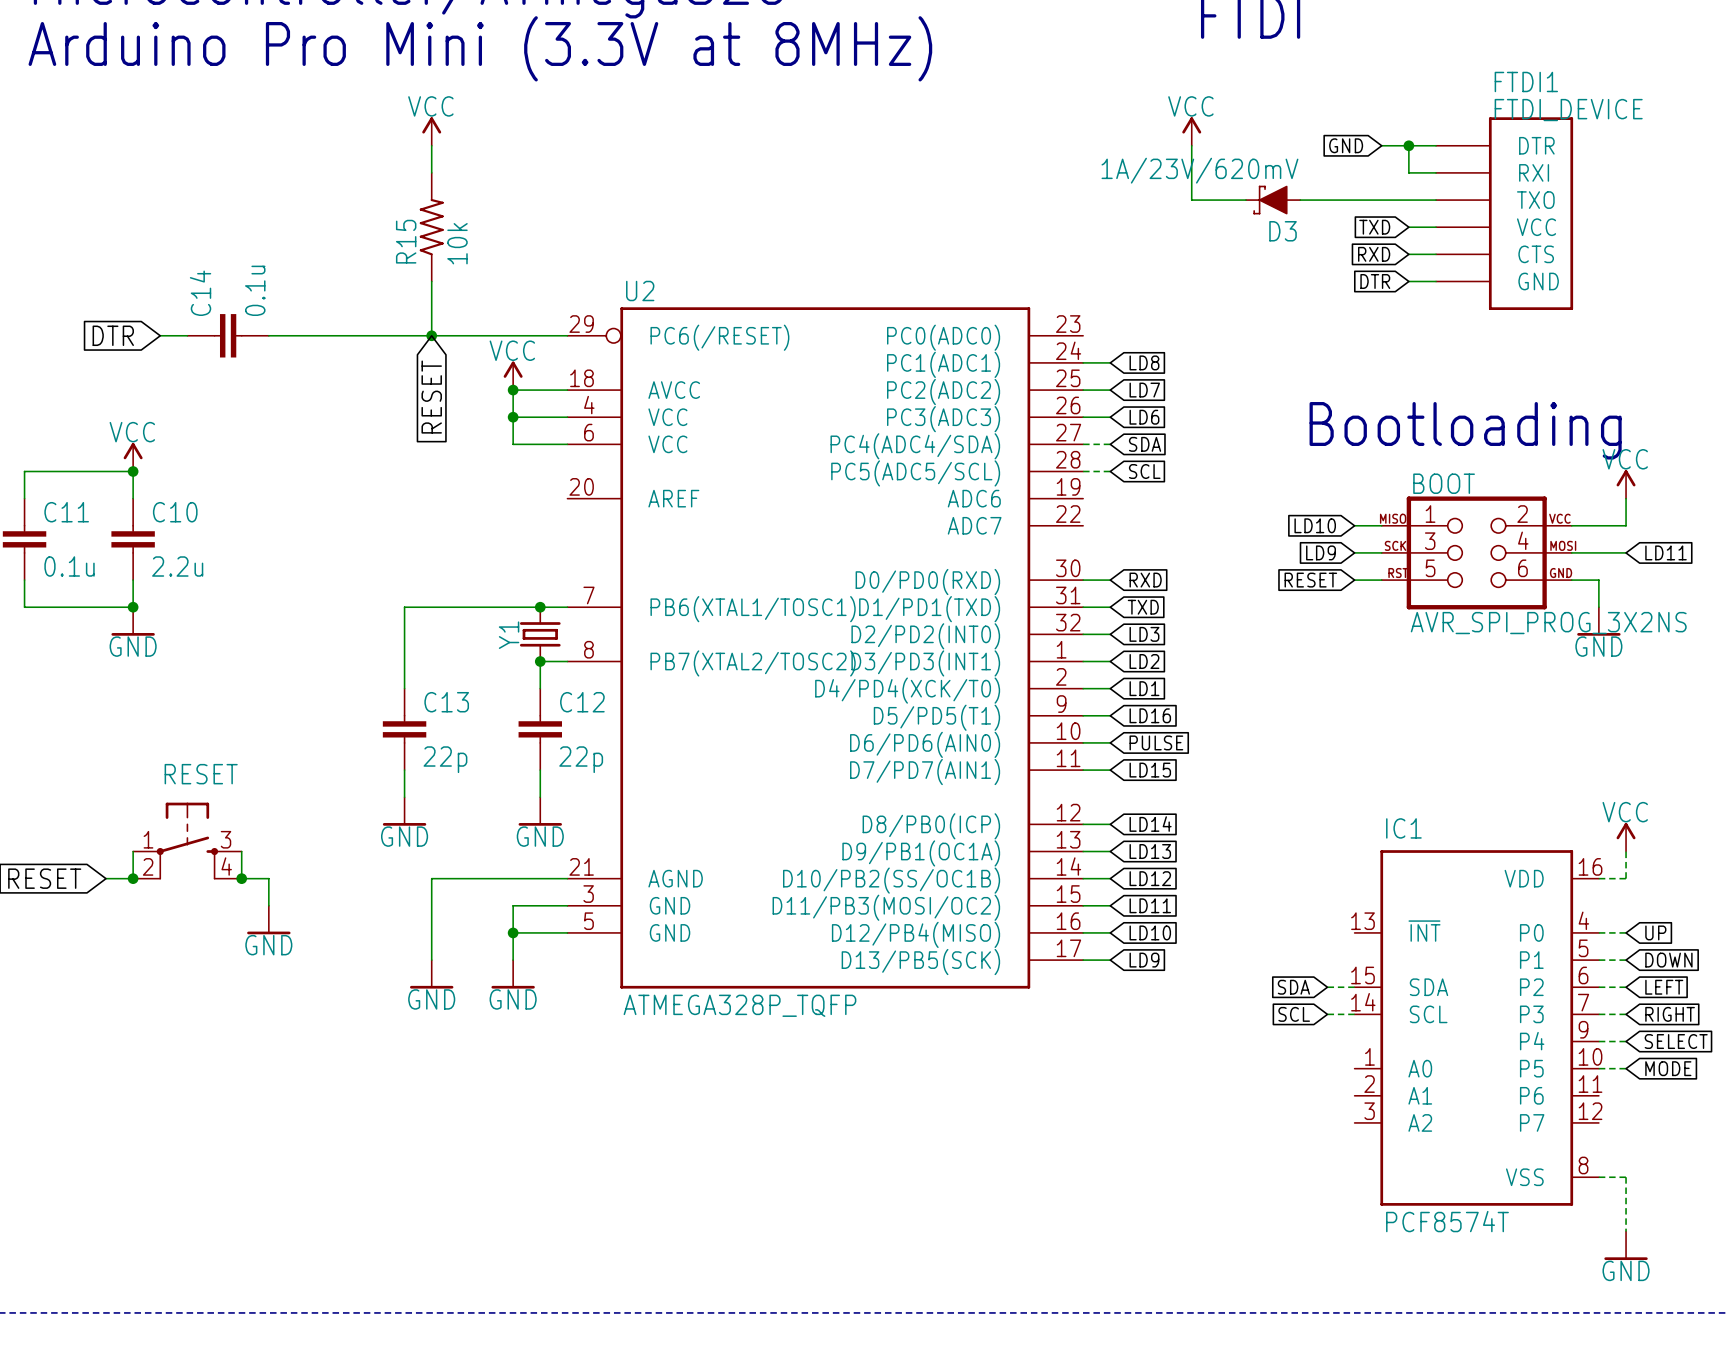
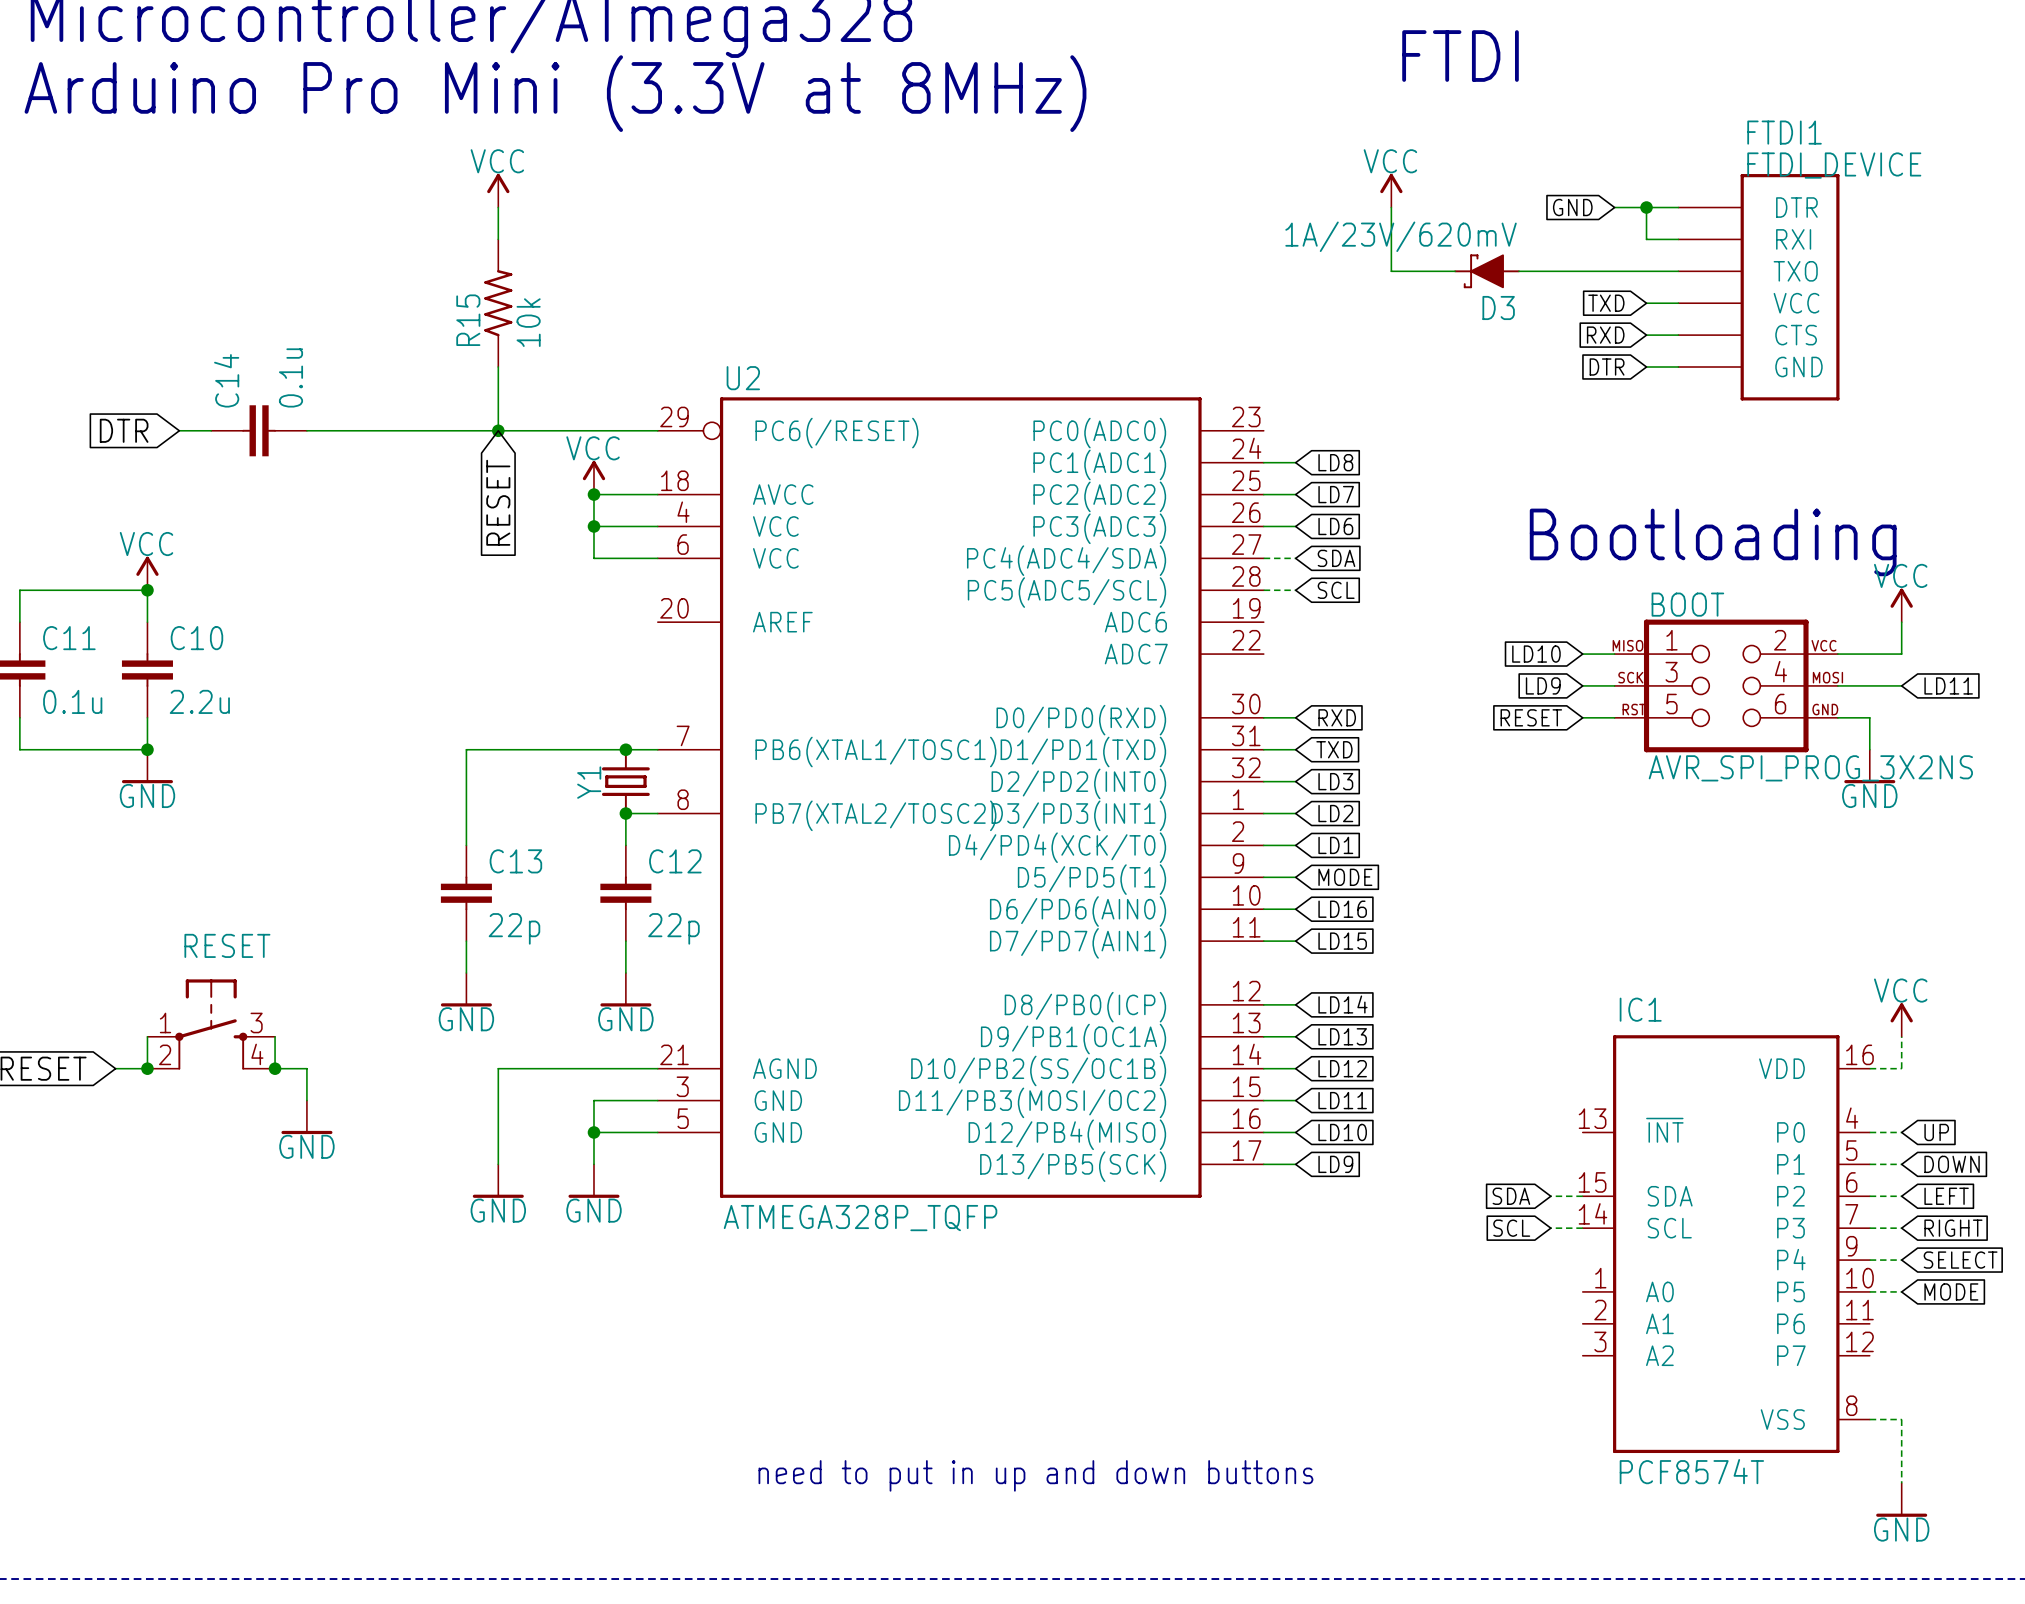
global label: LD16 (1150, 715) -> MODE (1345, 877)
global label: PULSE (1156, 742) -> LD16 (1342, 909)
text: none -> need to put in up and down buttons (1035, 1475)

